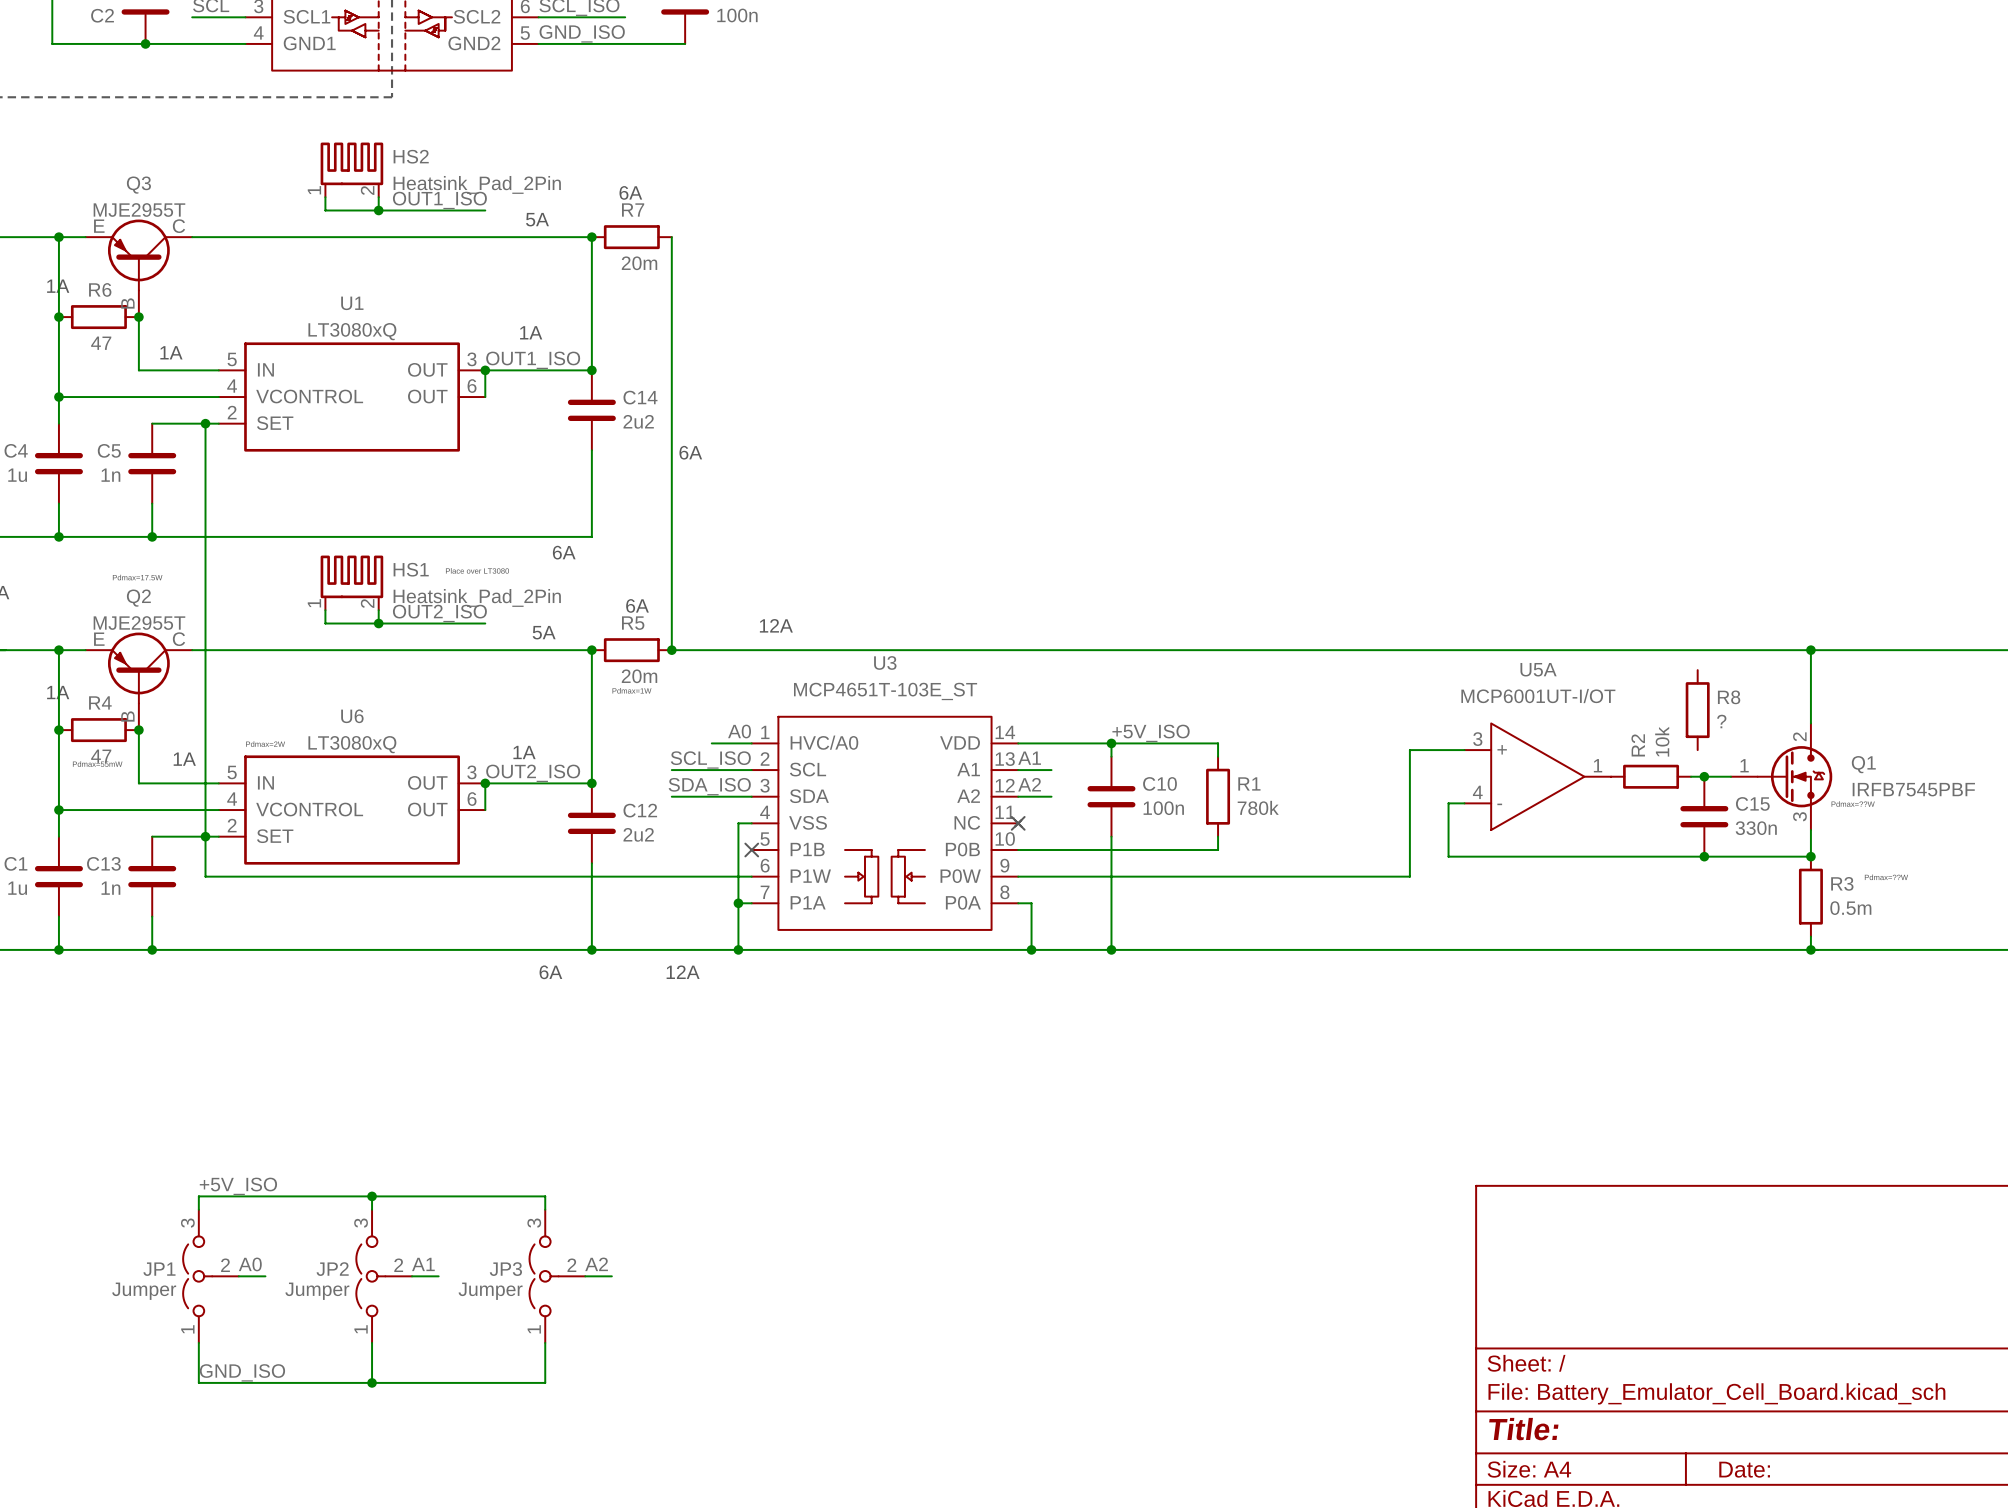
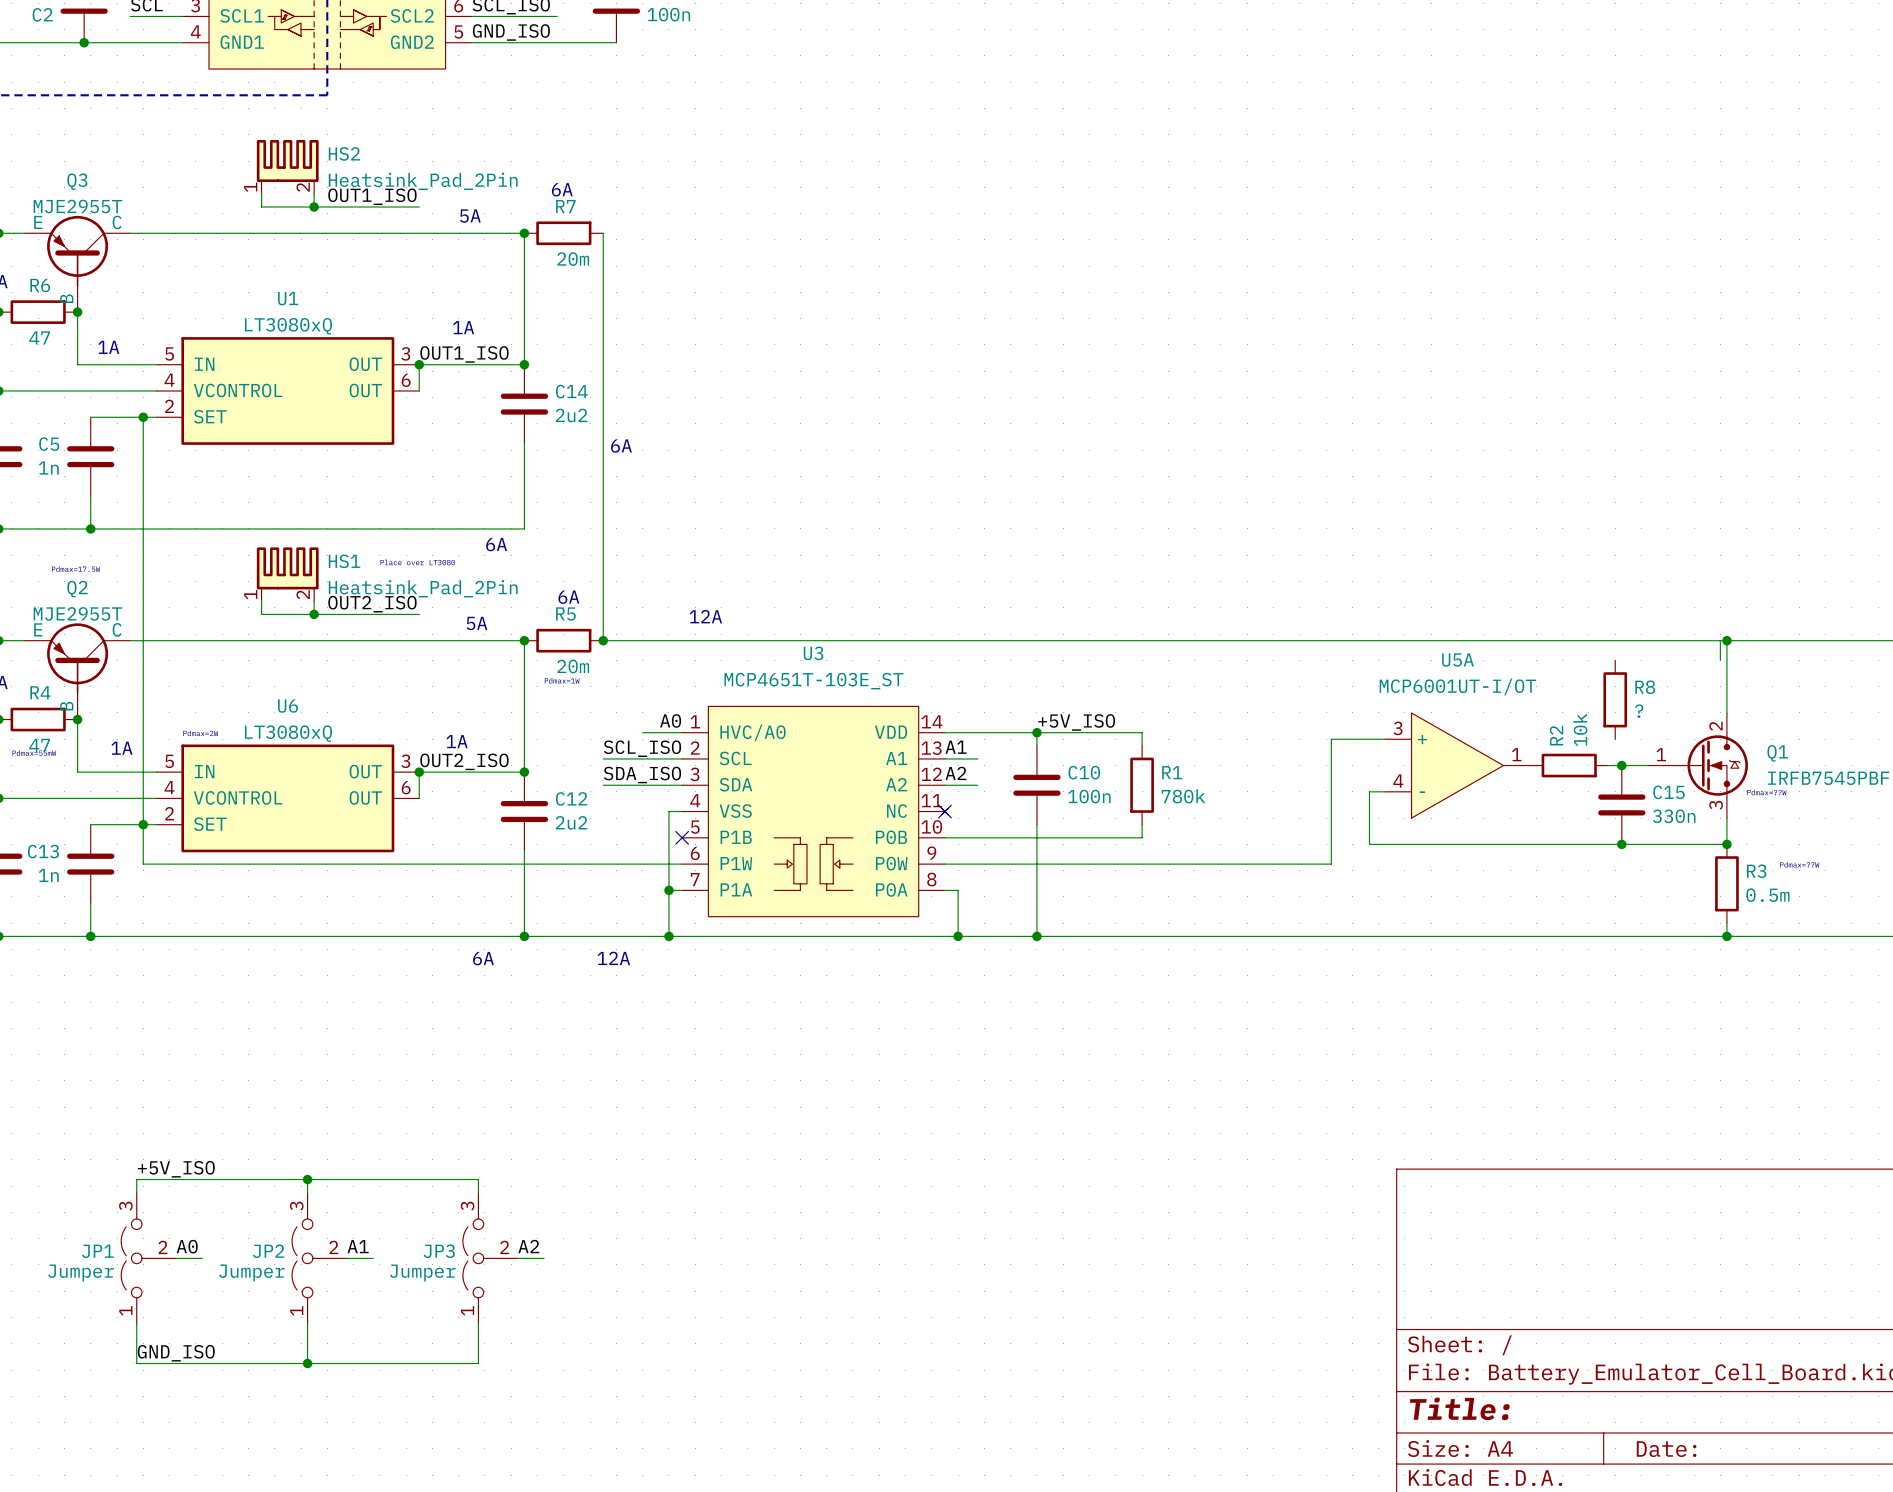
wire: none -> (1720, 640) (1720, 660)

